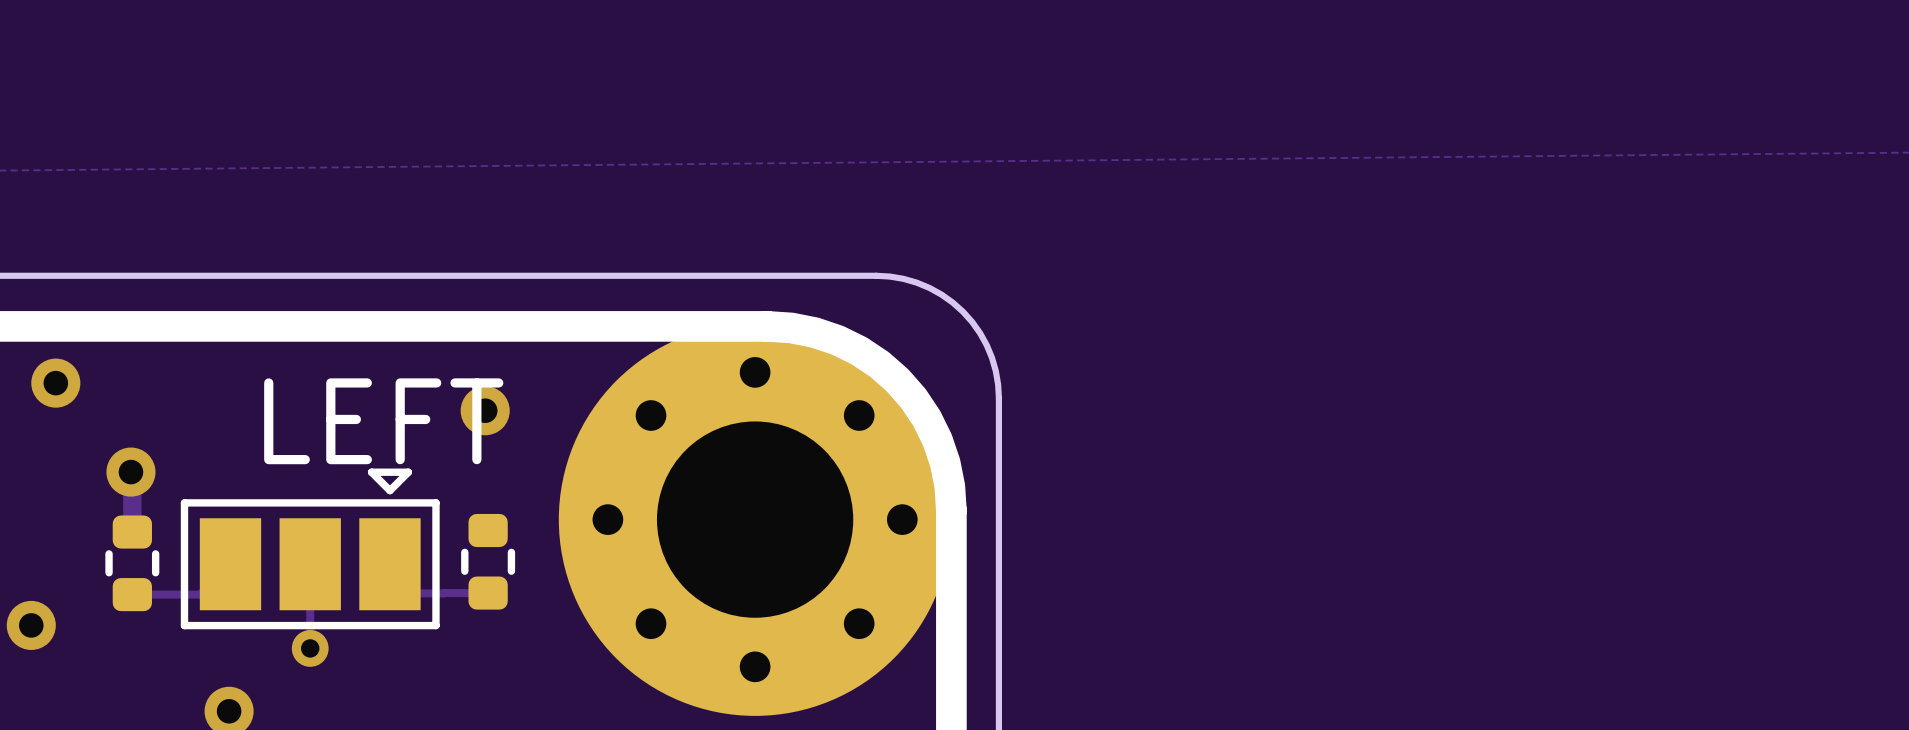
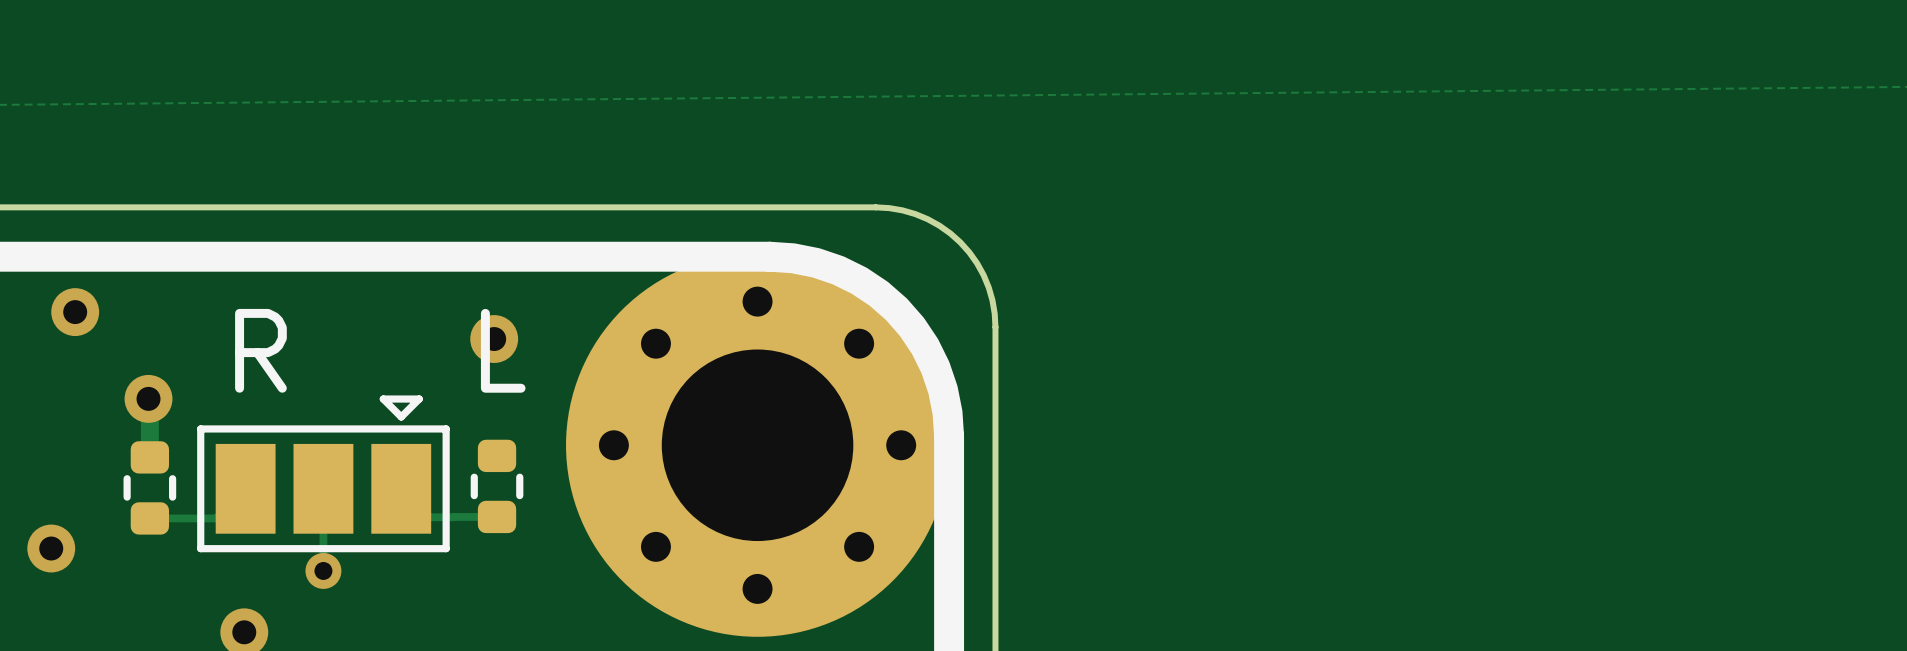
text: LEFT (383, 421) -> R L (380, 350)

